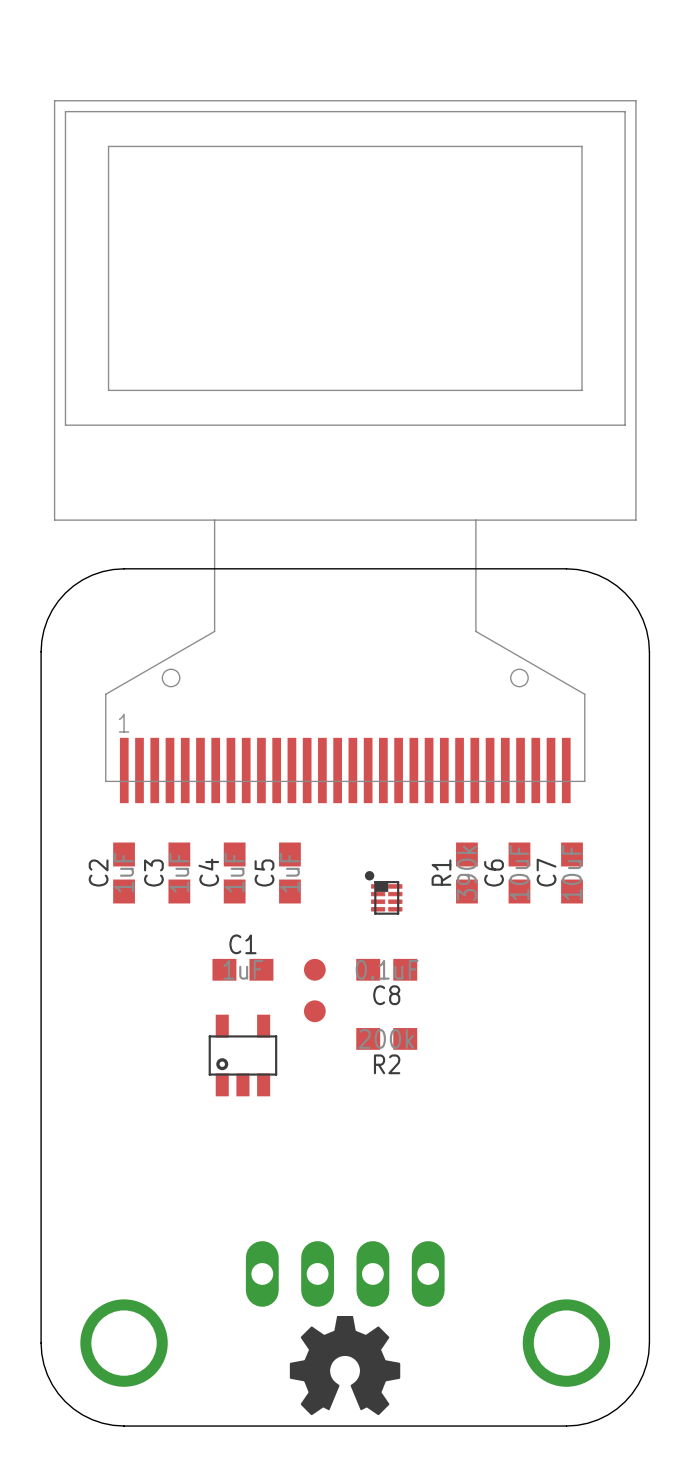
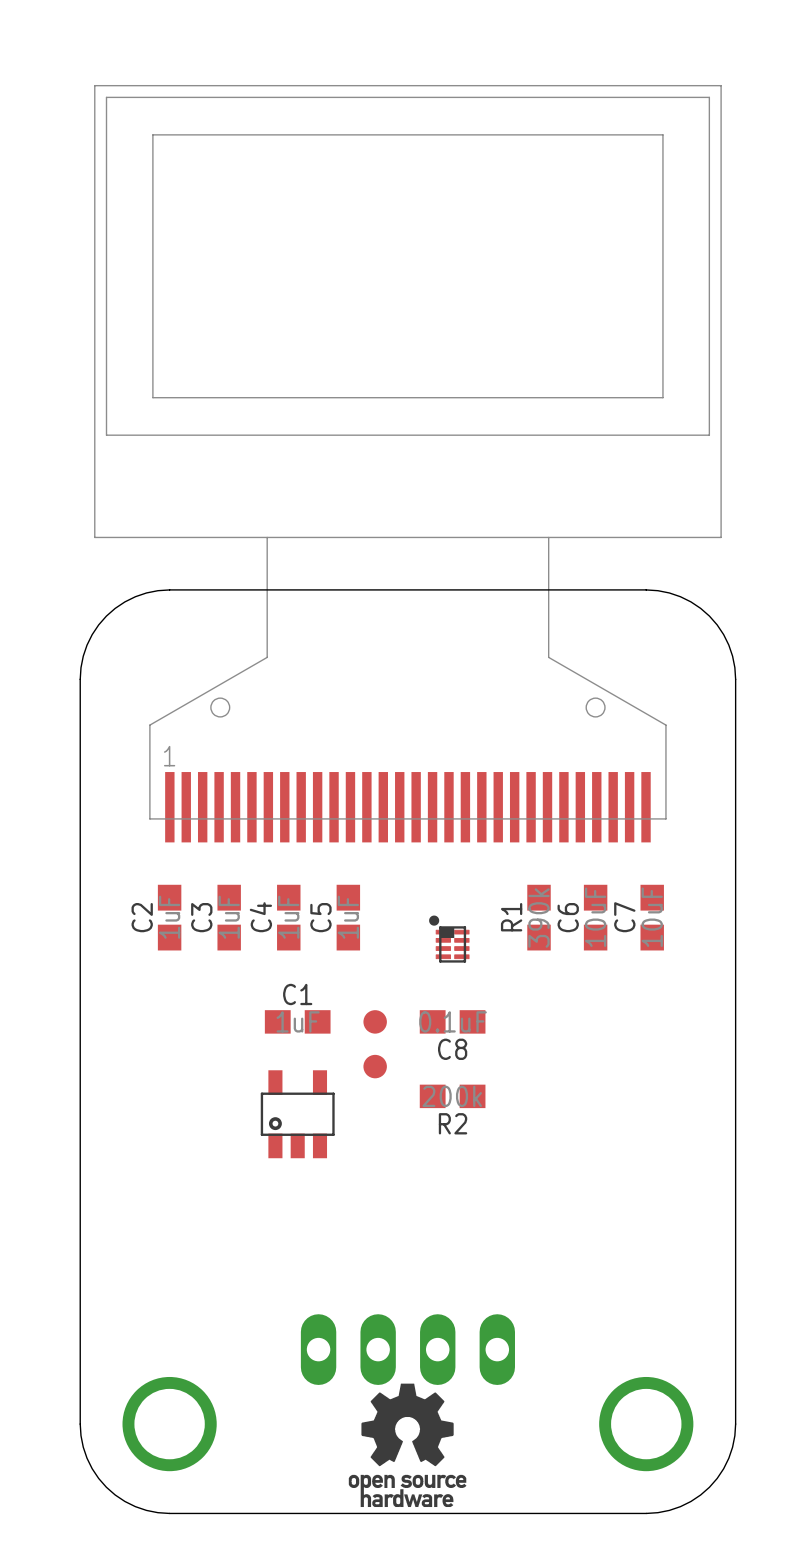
drawing shape: [289, 1315, 401, 1416] -> [348, 1383, 467, 1508]

